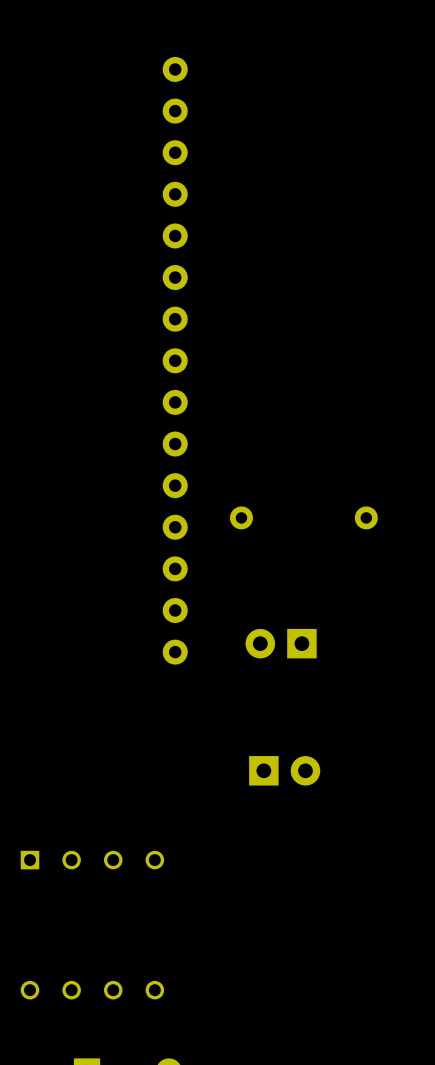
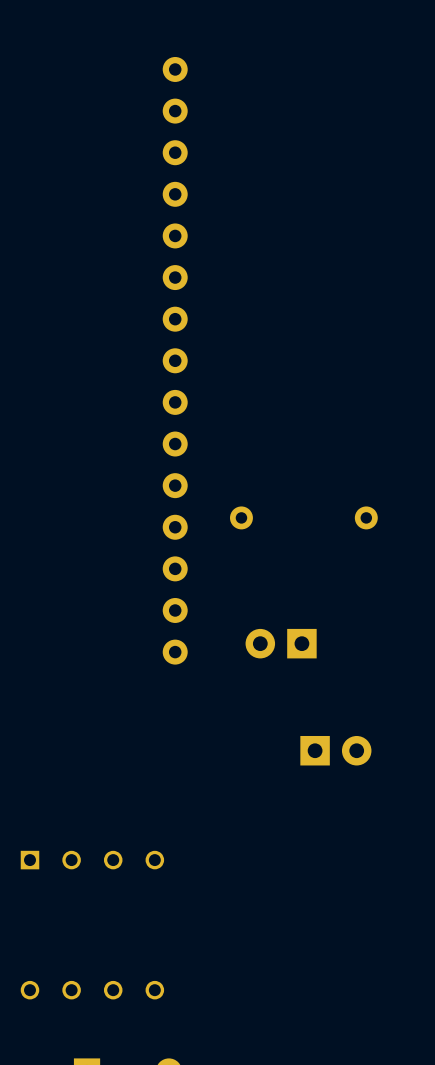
part position: (284, 770) -> (335, 750)

